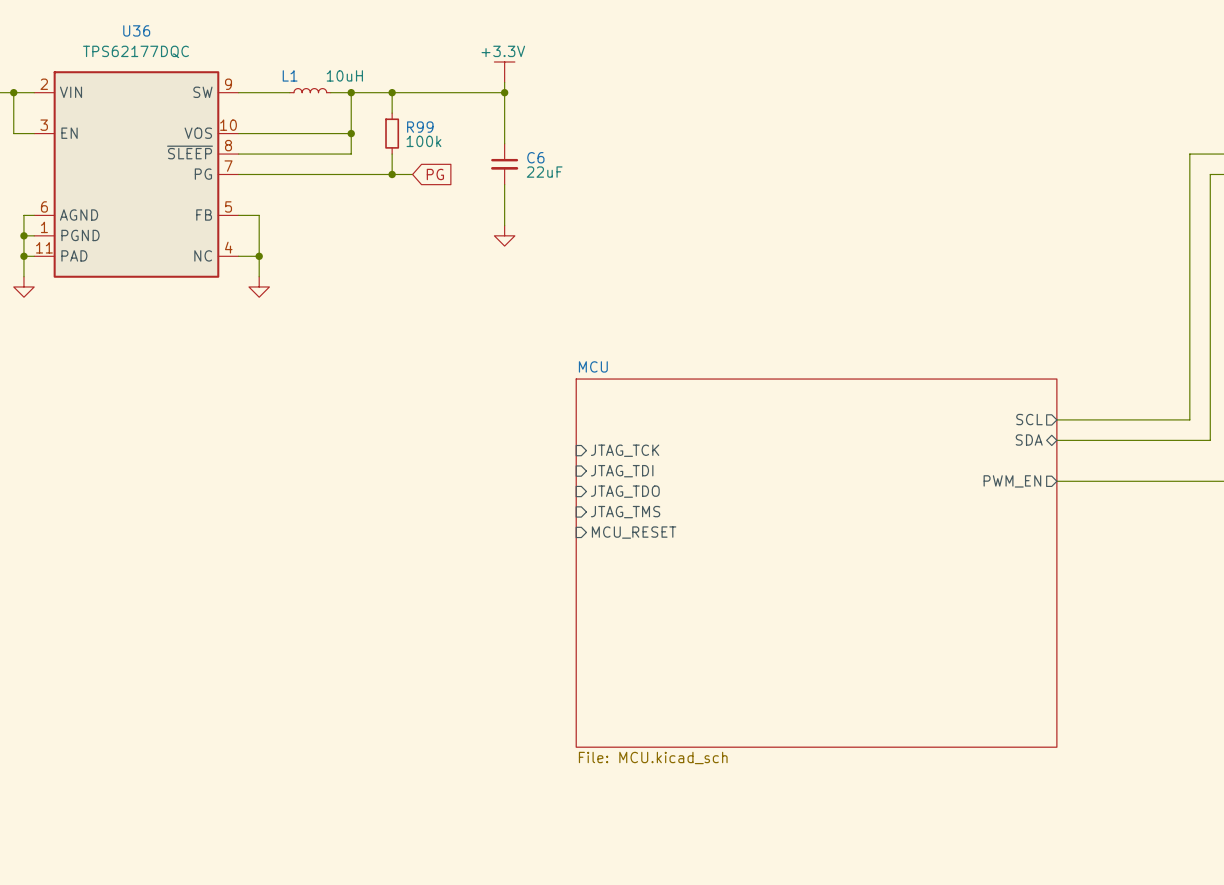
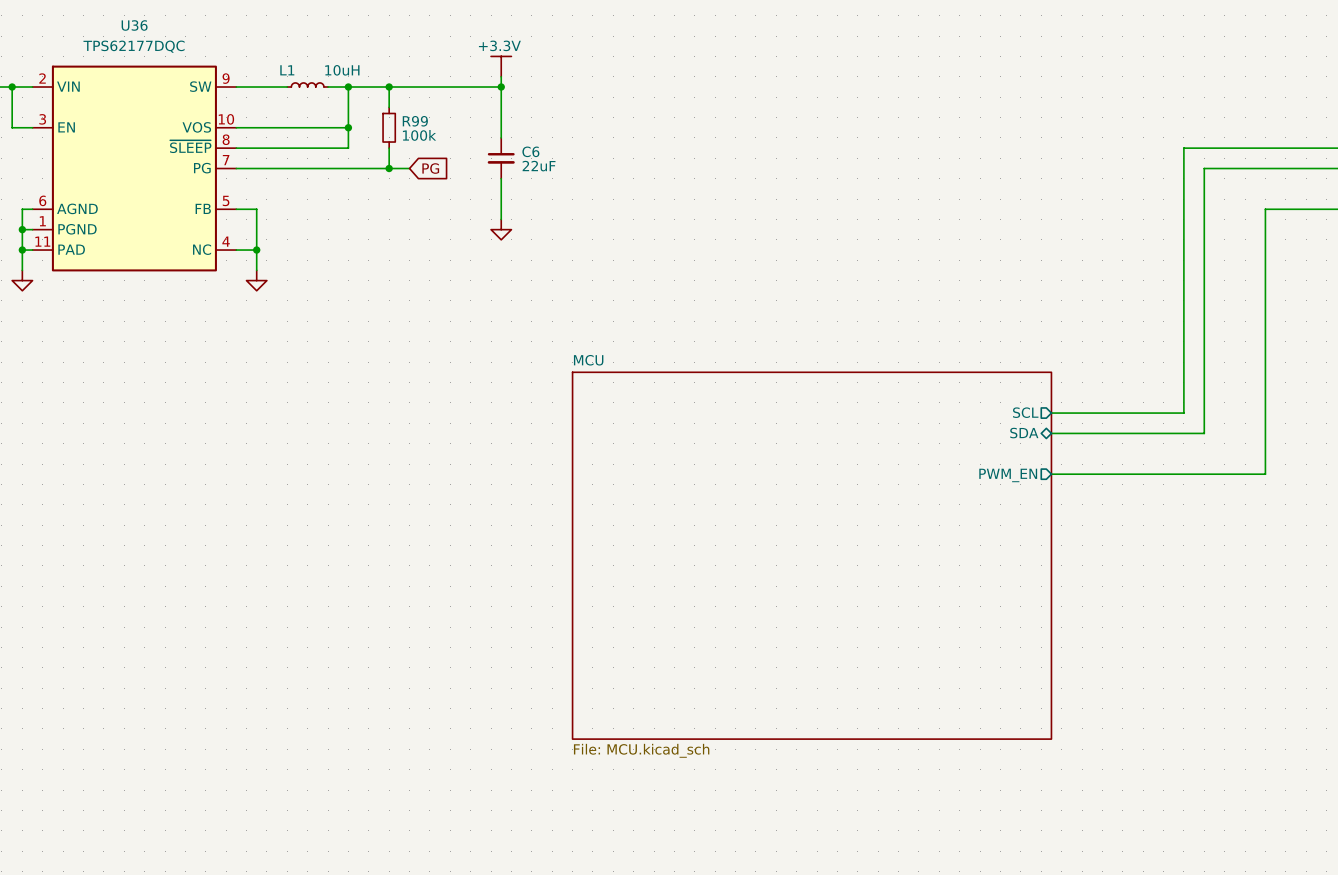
sheet pin: JTAG_TCK (625, 450) -> none
sheet pin: JTAG_TDI (622, 471) -> none
sheet pin: JTAG_TDO (625, 491) -> none
sheet pin: JTAG_TMS (625, 512) -> none
sheet pin: MCU_RESET (634, 532) -> none

